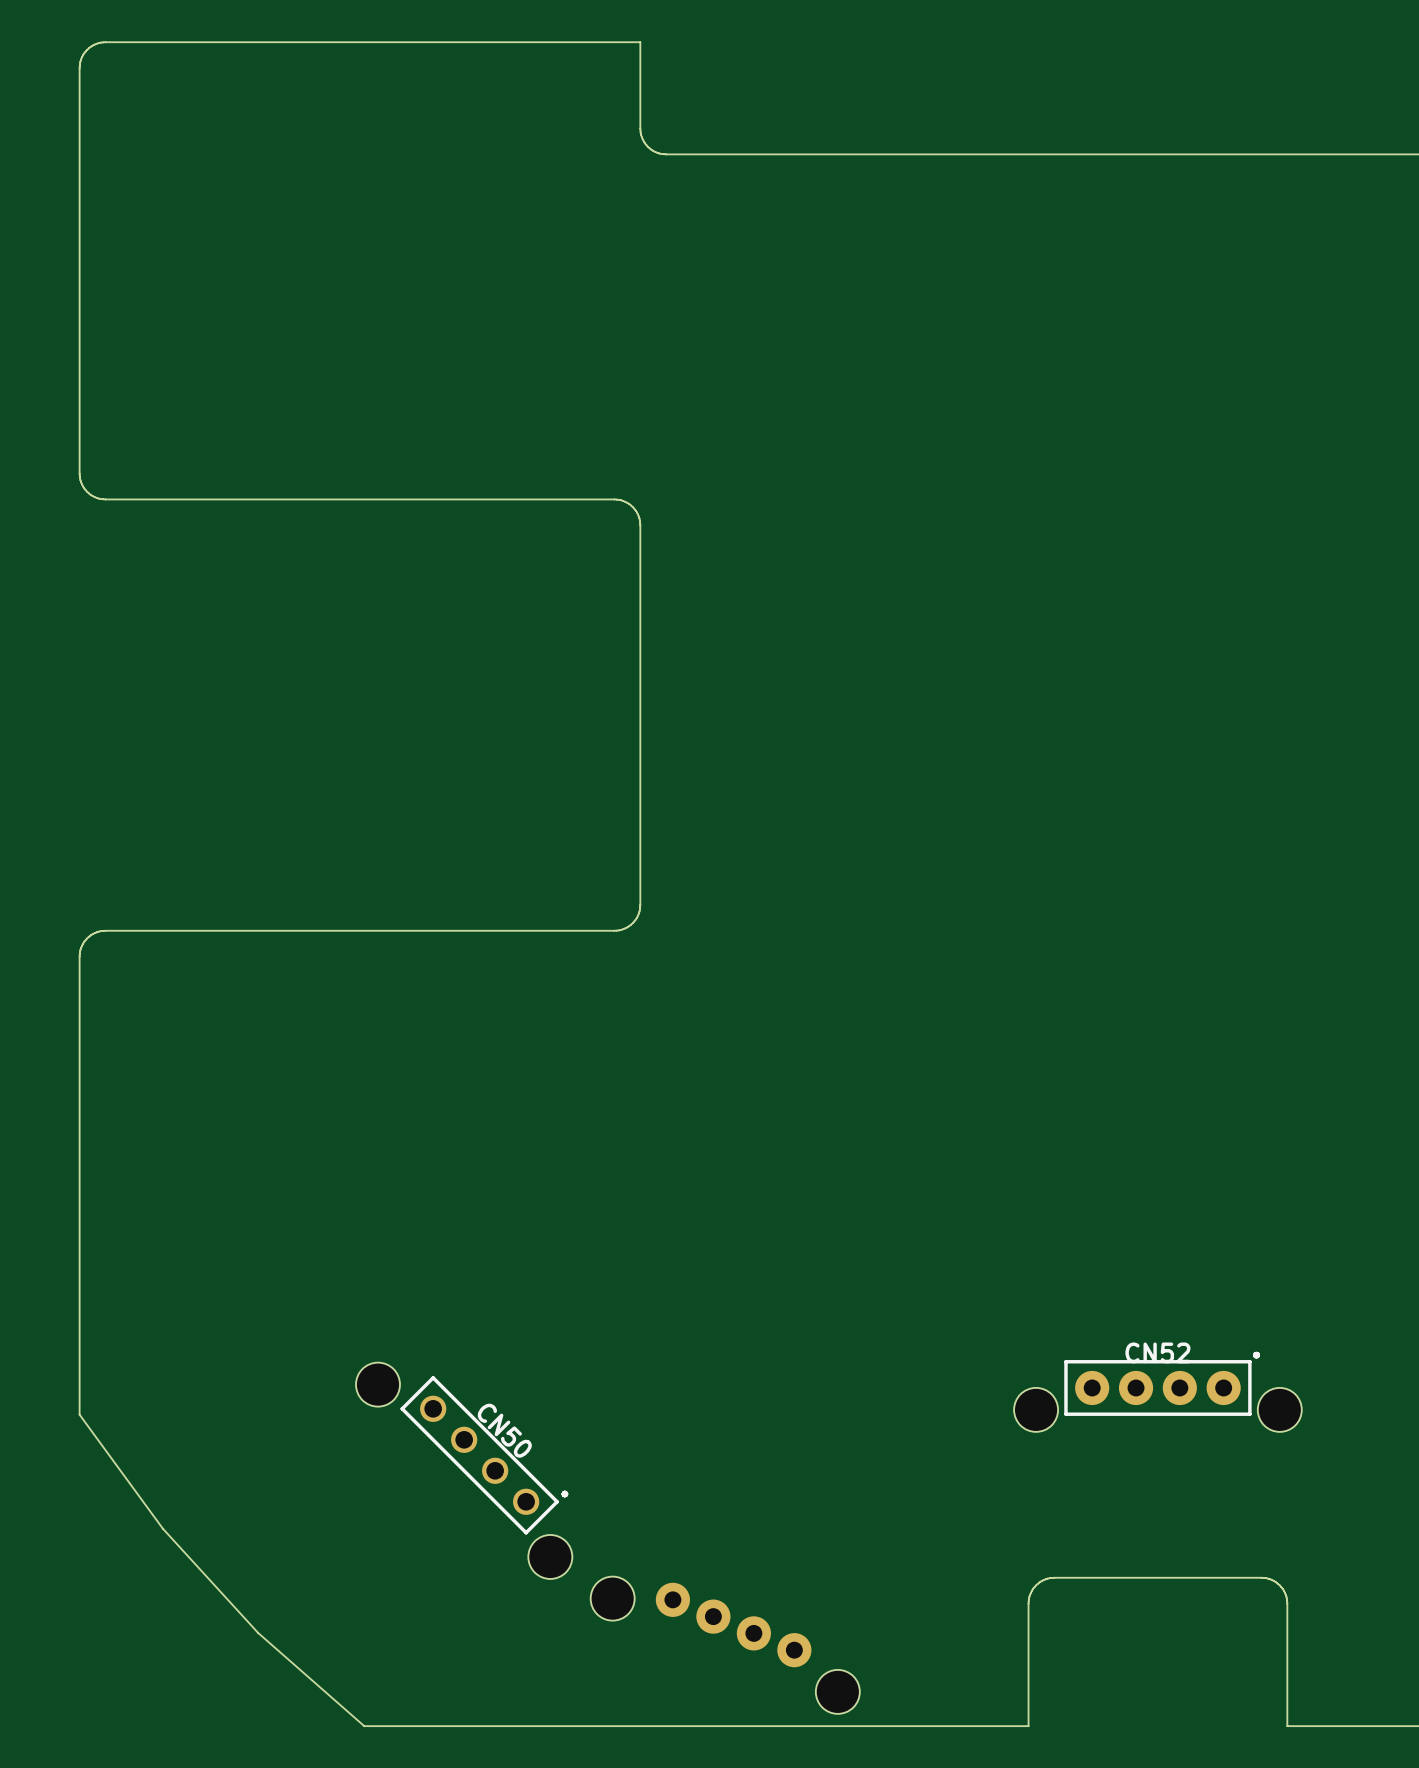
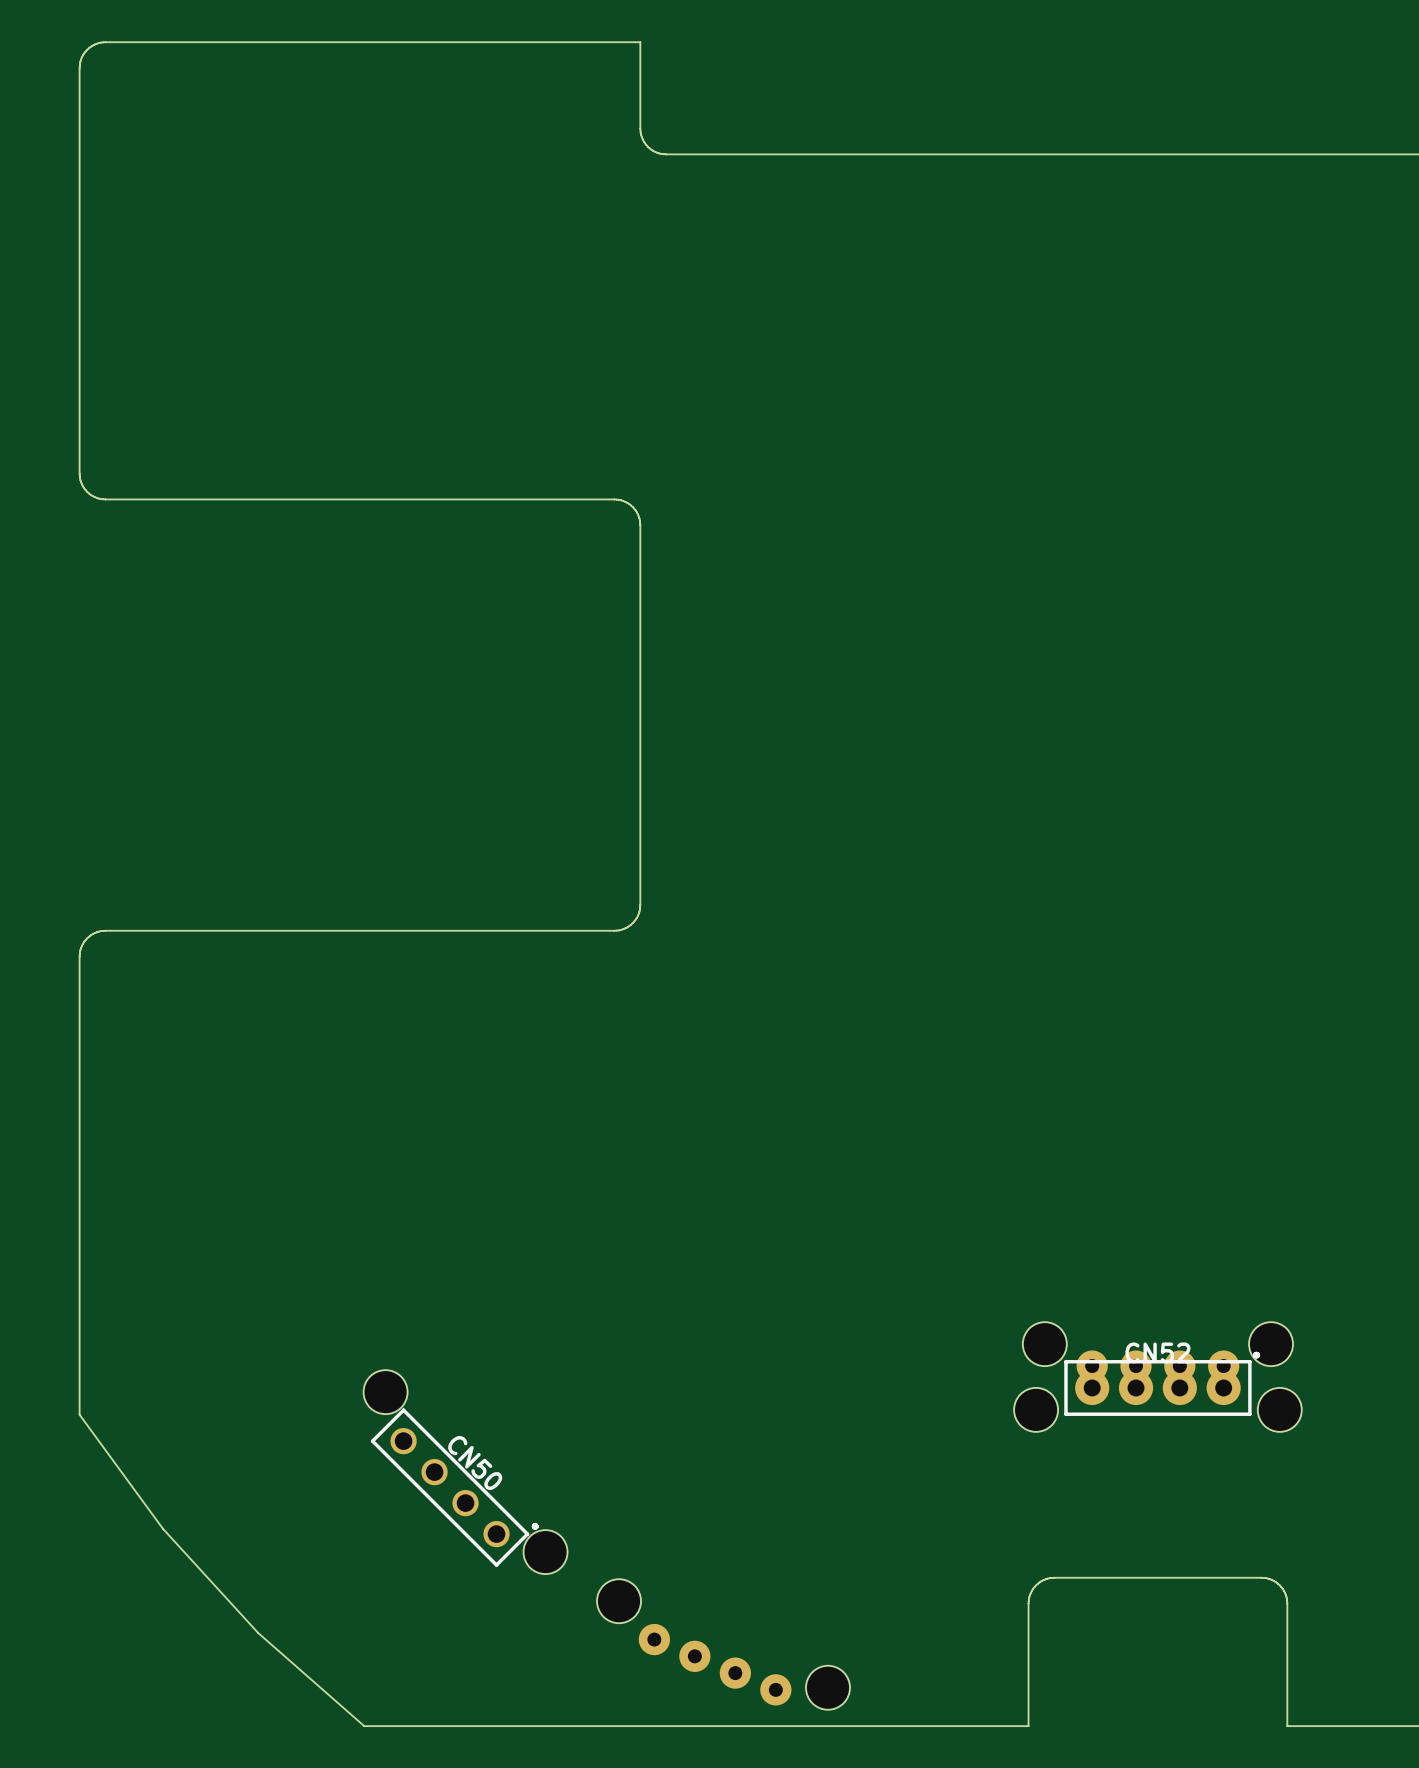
part: none -> (1157, 1351)
CN50 footprint: [356, 1362, 573, 1579] -> [363, 1370, 568, 1575]
CN50 name position: CN50 (504, 1430) -> CN50 (475, 1463)
part footprint: [590, 1576, 860, 1714] -> [597, 1579, 850, 1710]

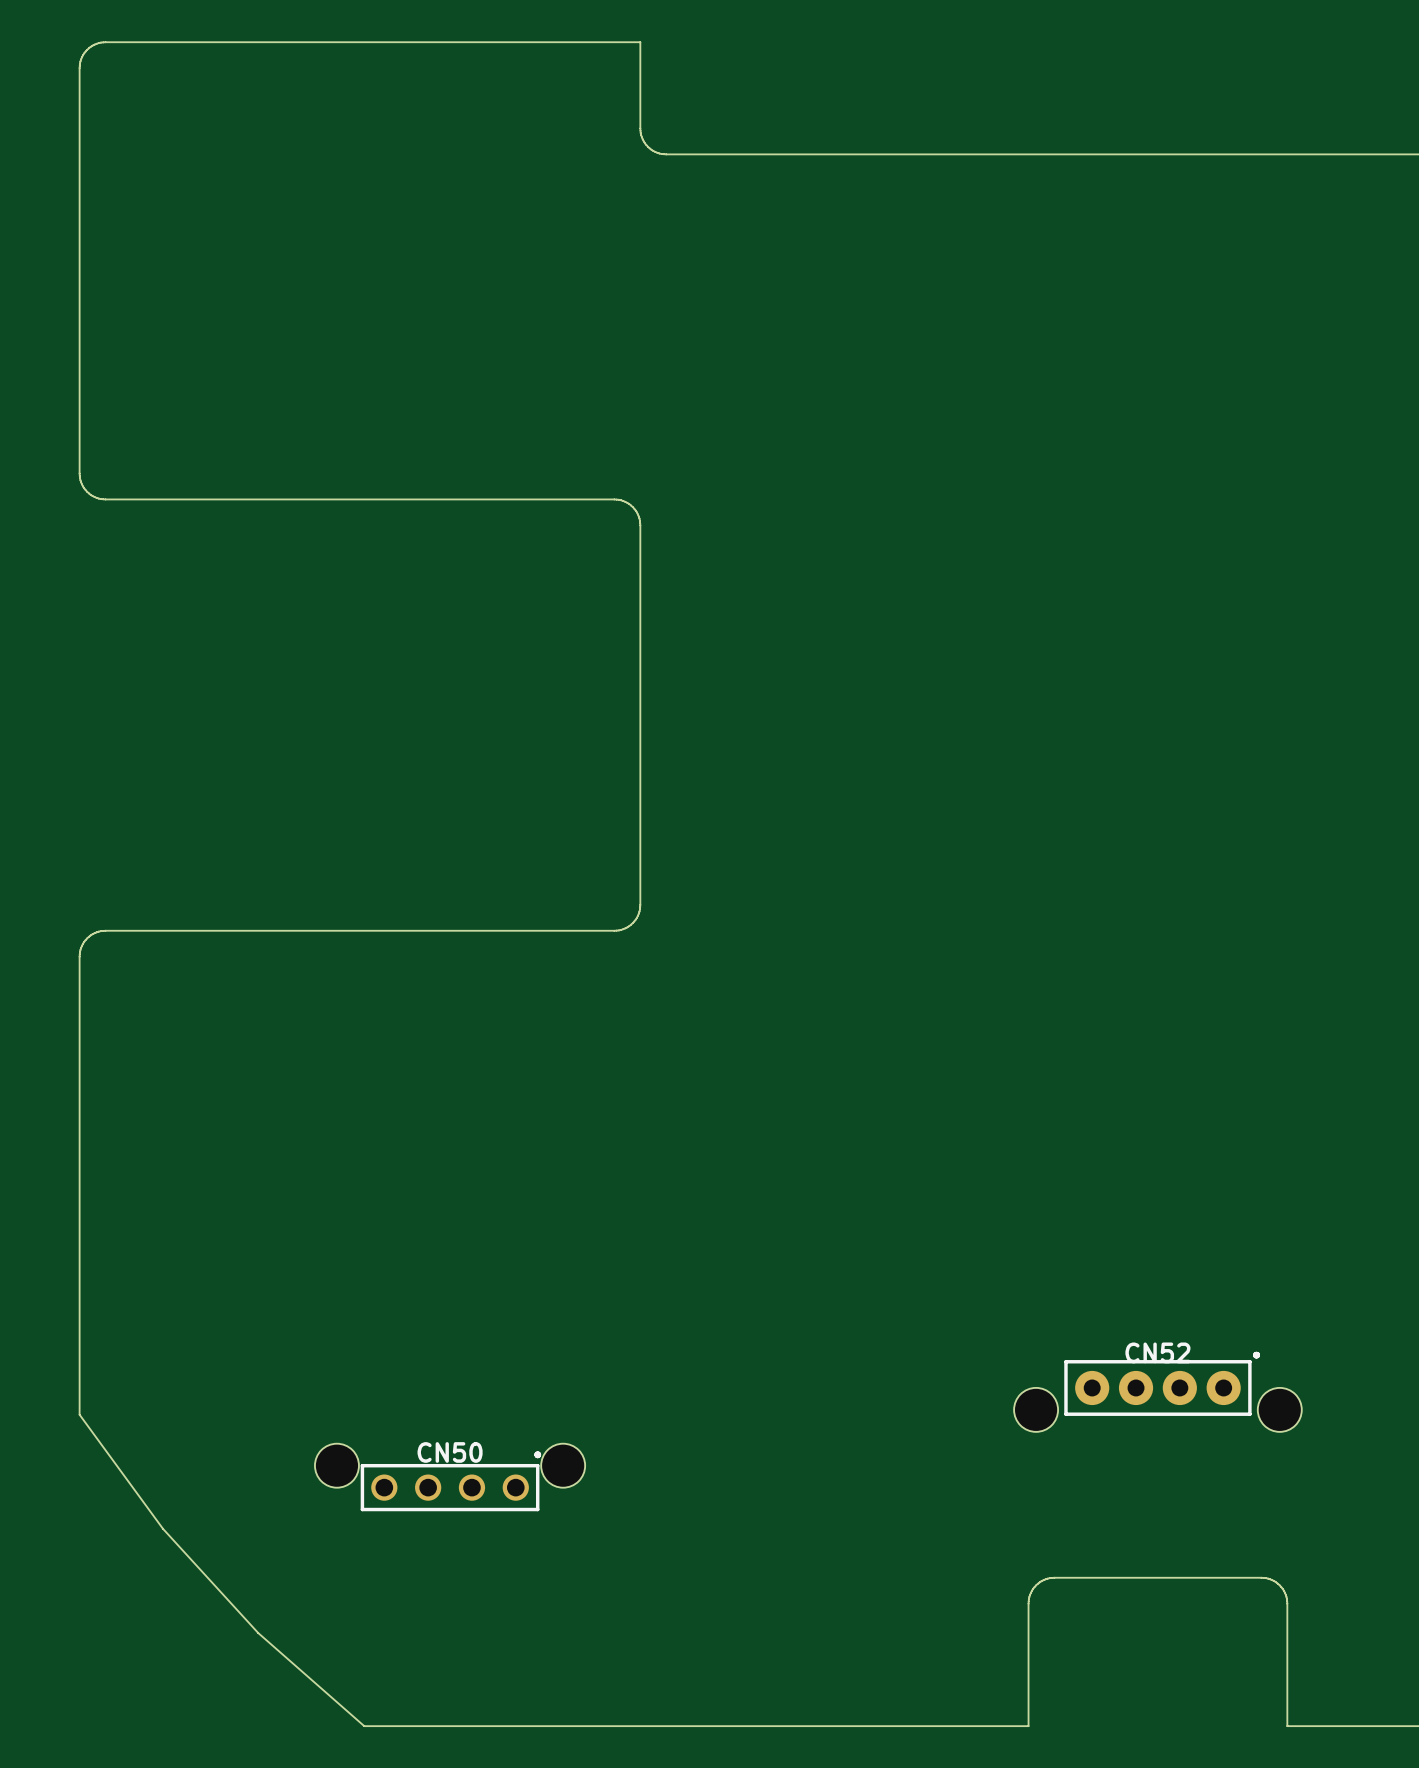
part: (1157, 1351) -> none
CN50 rotation: 0° (465, 1472) -> 45° counterclockwise (450, 1477)
part: (723, 1644) -> none

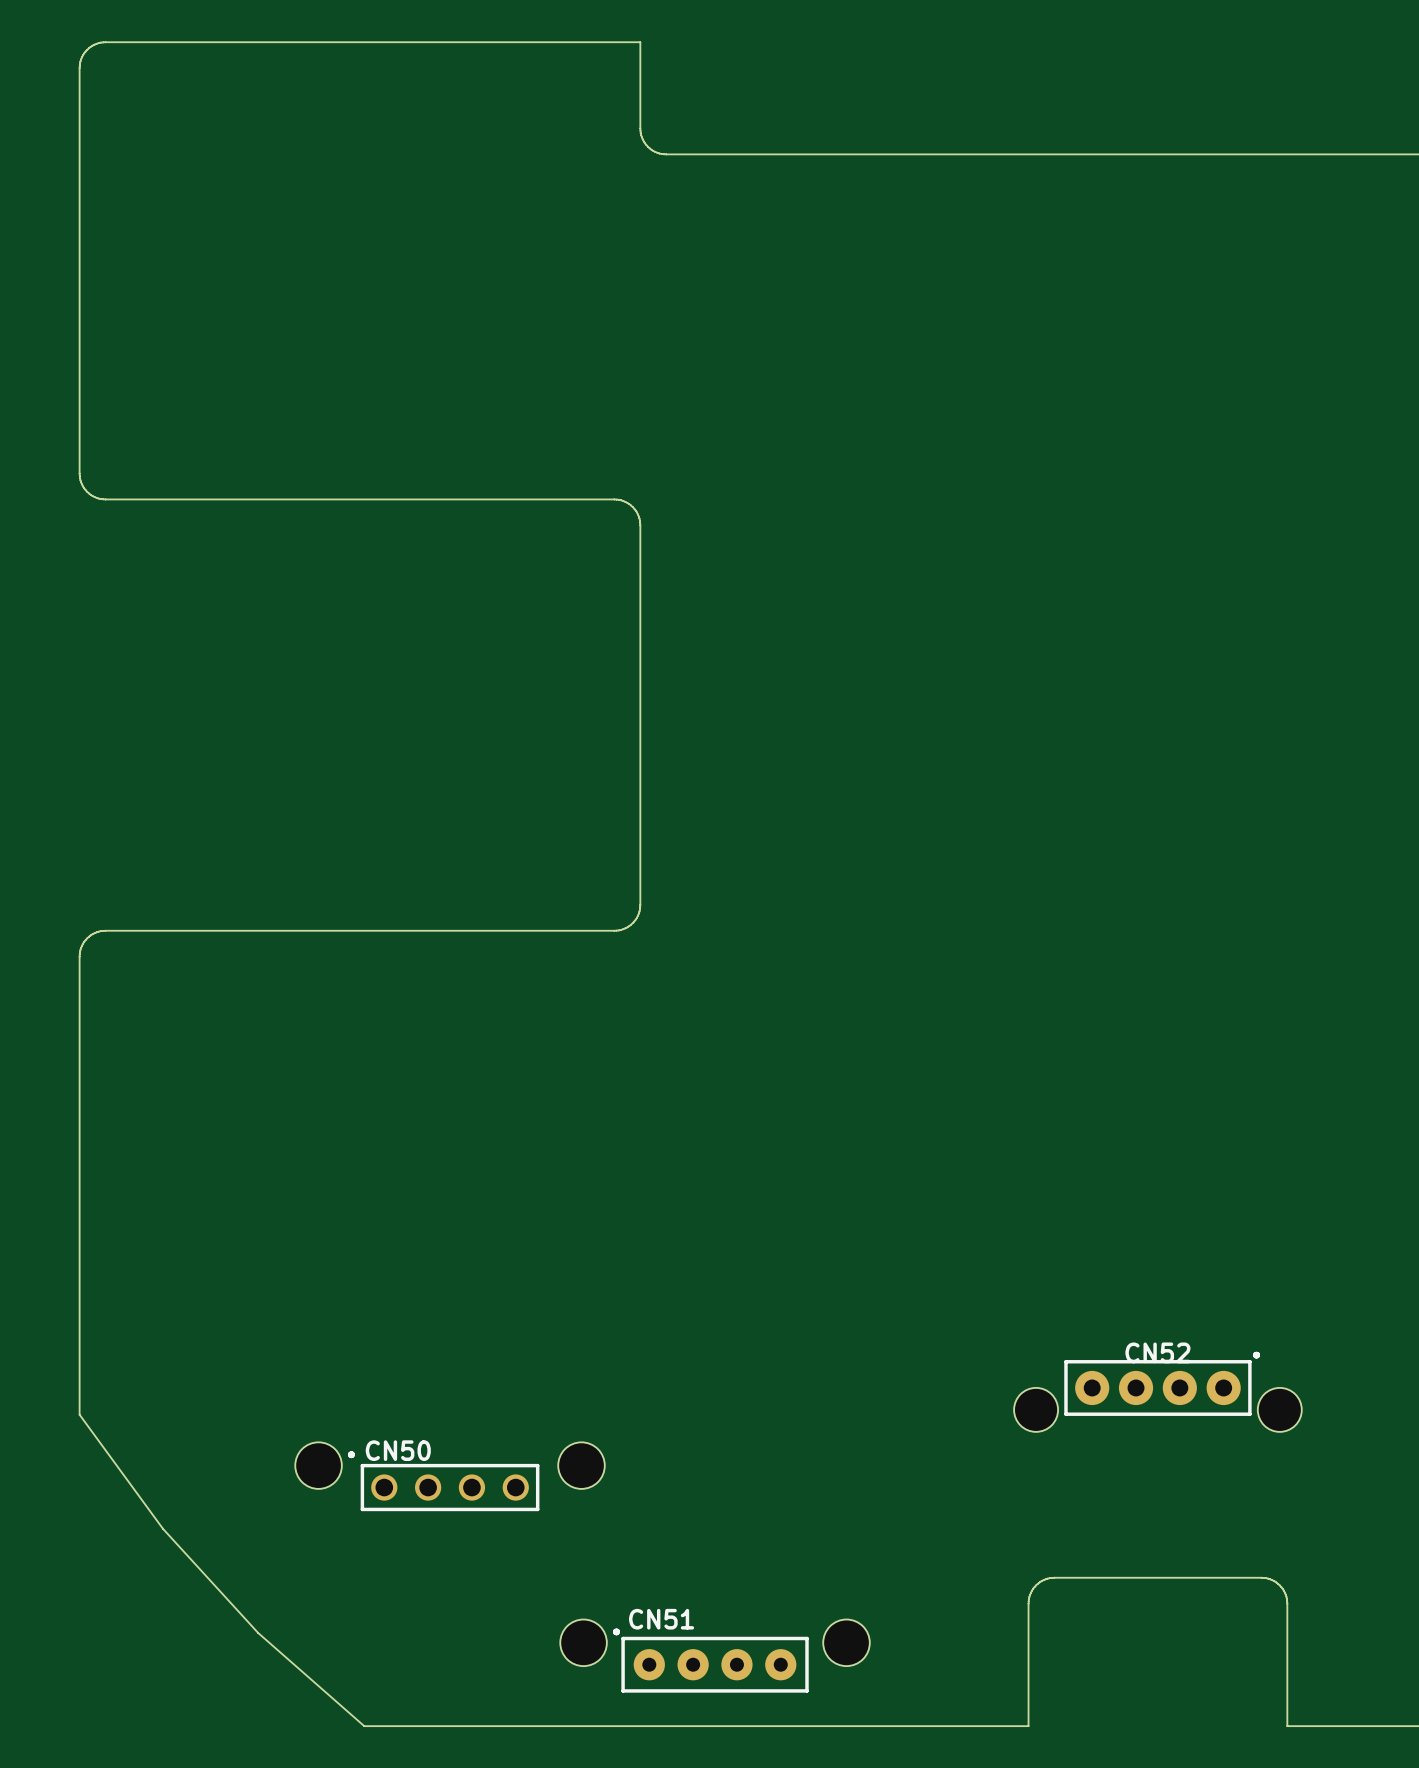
CN50 footprint: [314, 1443, 586, 1512] -> [295, 1442, 605, 1512]
CN50 name position: CN50 (450, 1452) -> CN50 (398, 1450)
CN51: none -> (715, 1656)

